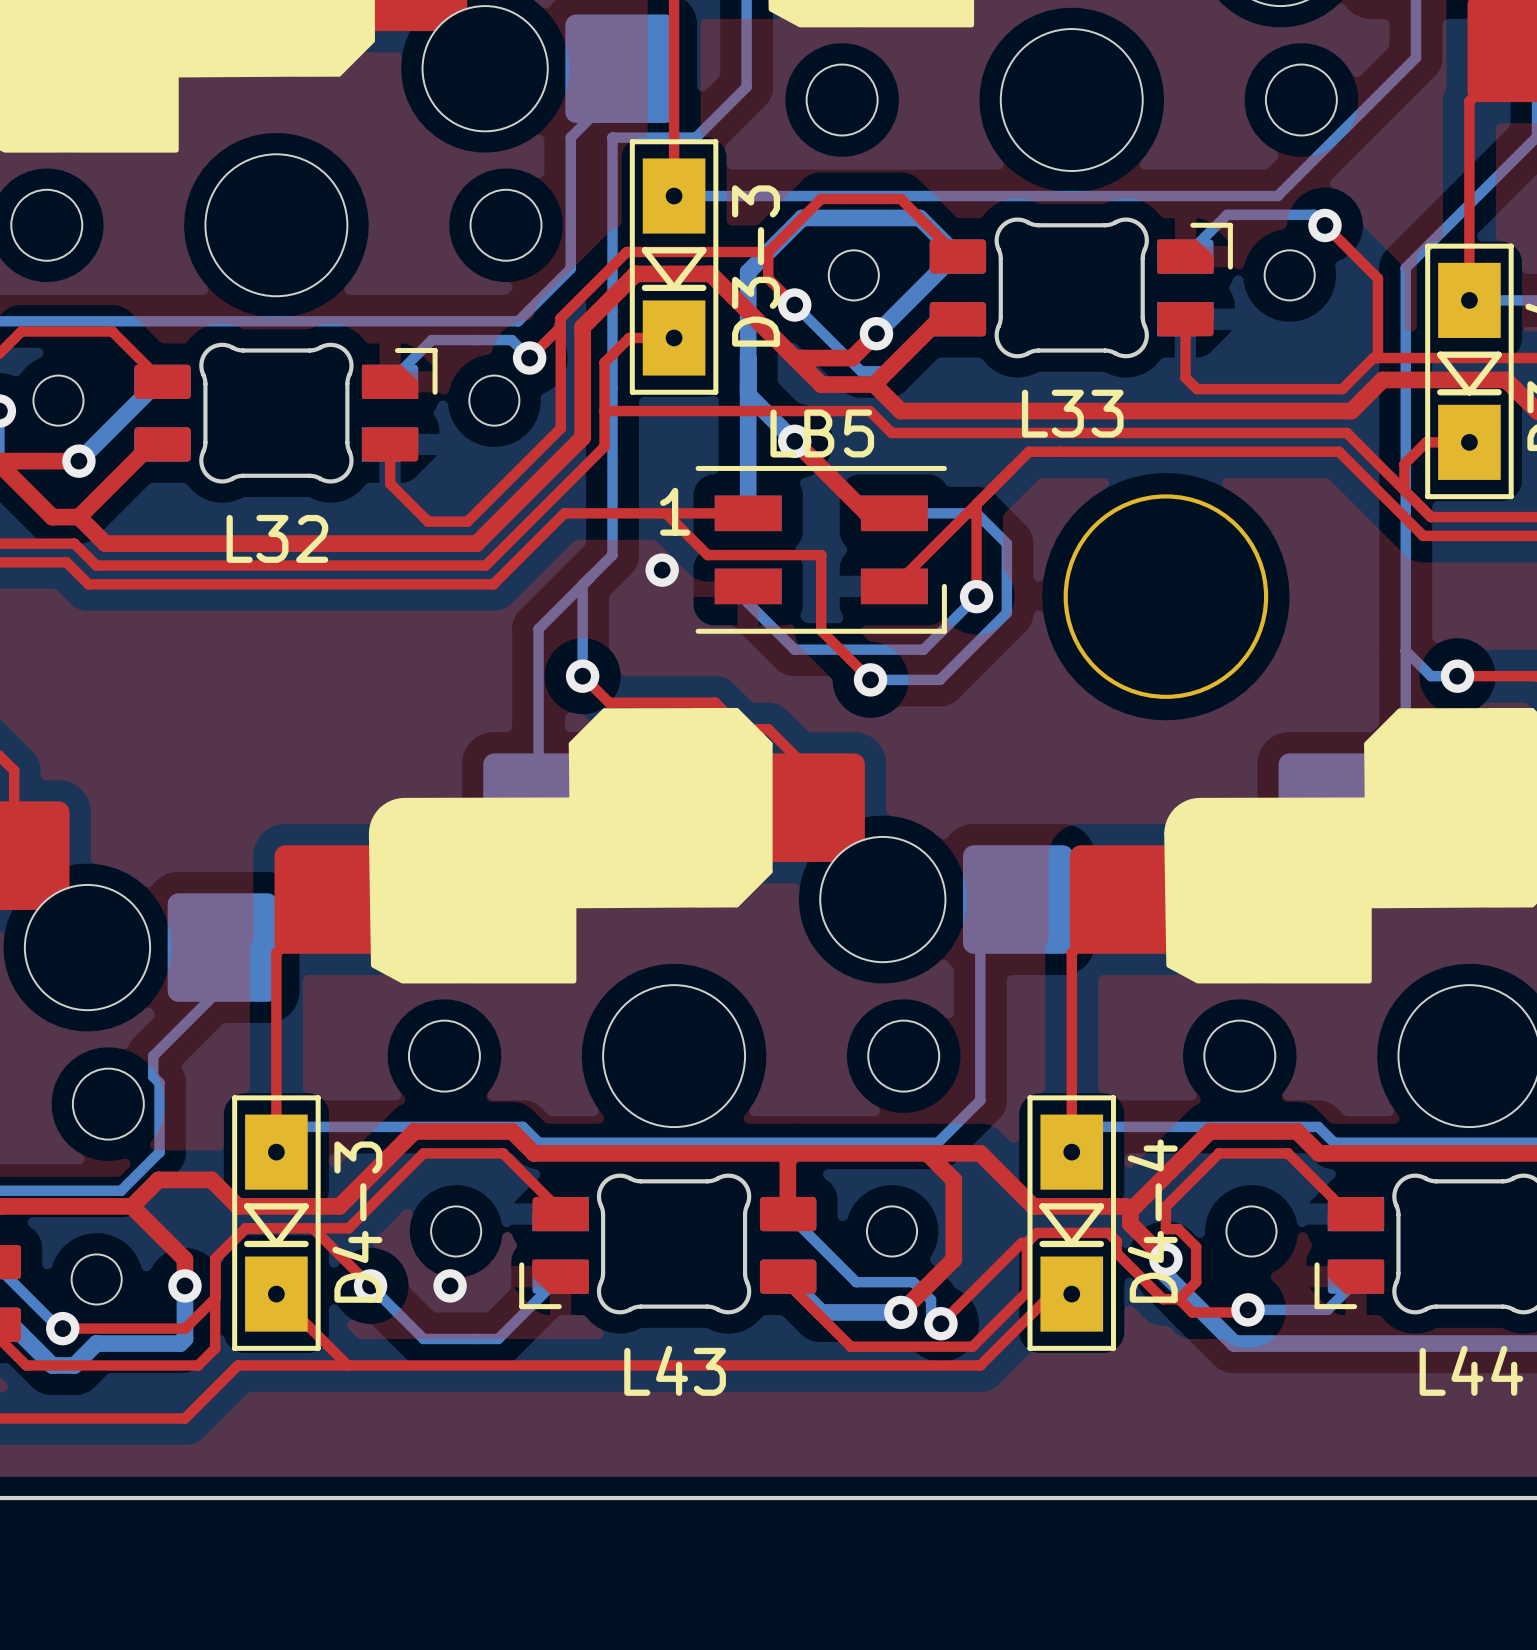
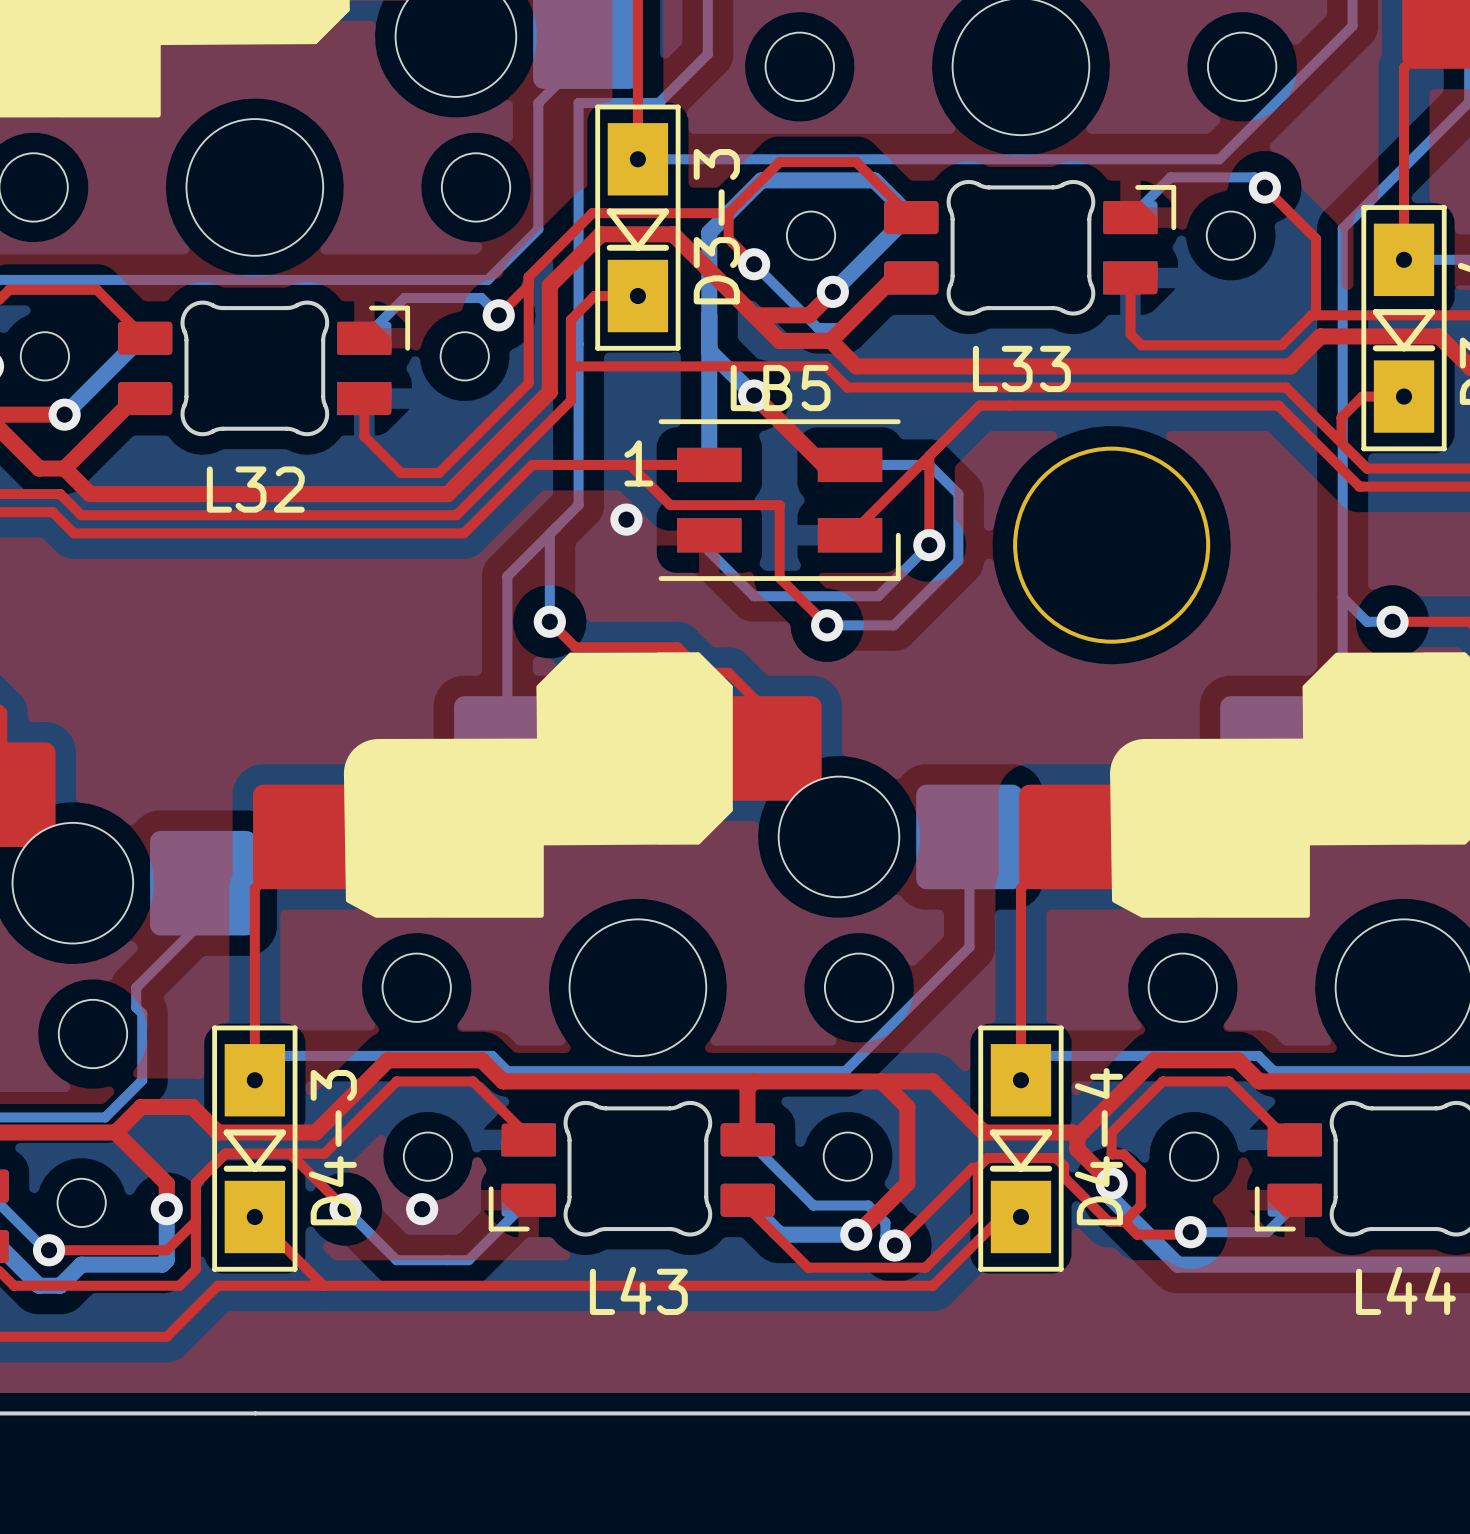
bottom track: (1018, 899) (980, 937) (980, 1100) (937, 1142) (889, 1142) -> (969, 836) (969, 947) (845, 1071)

